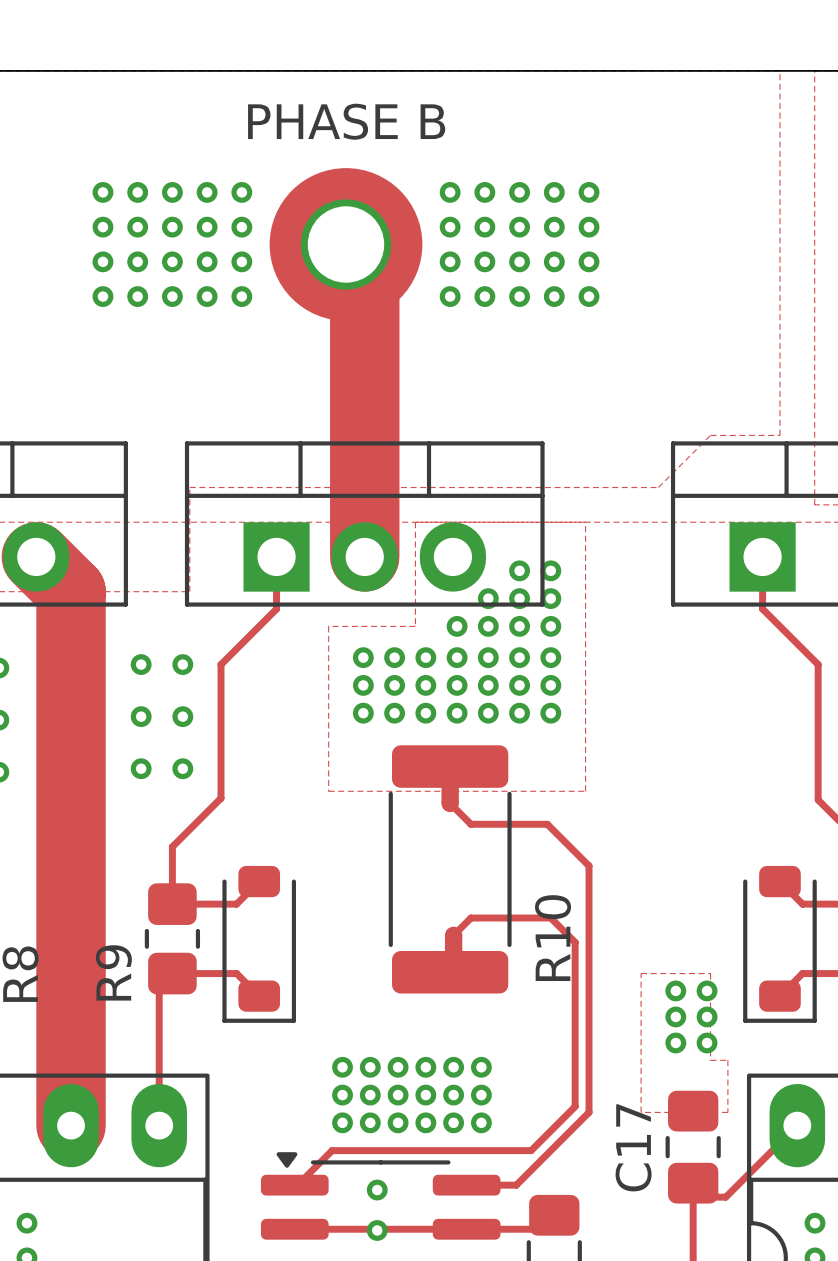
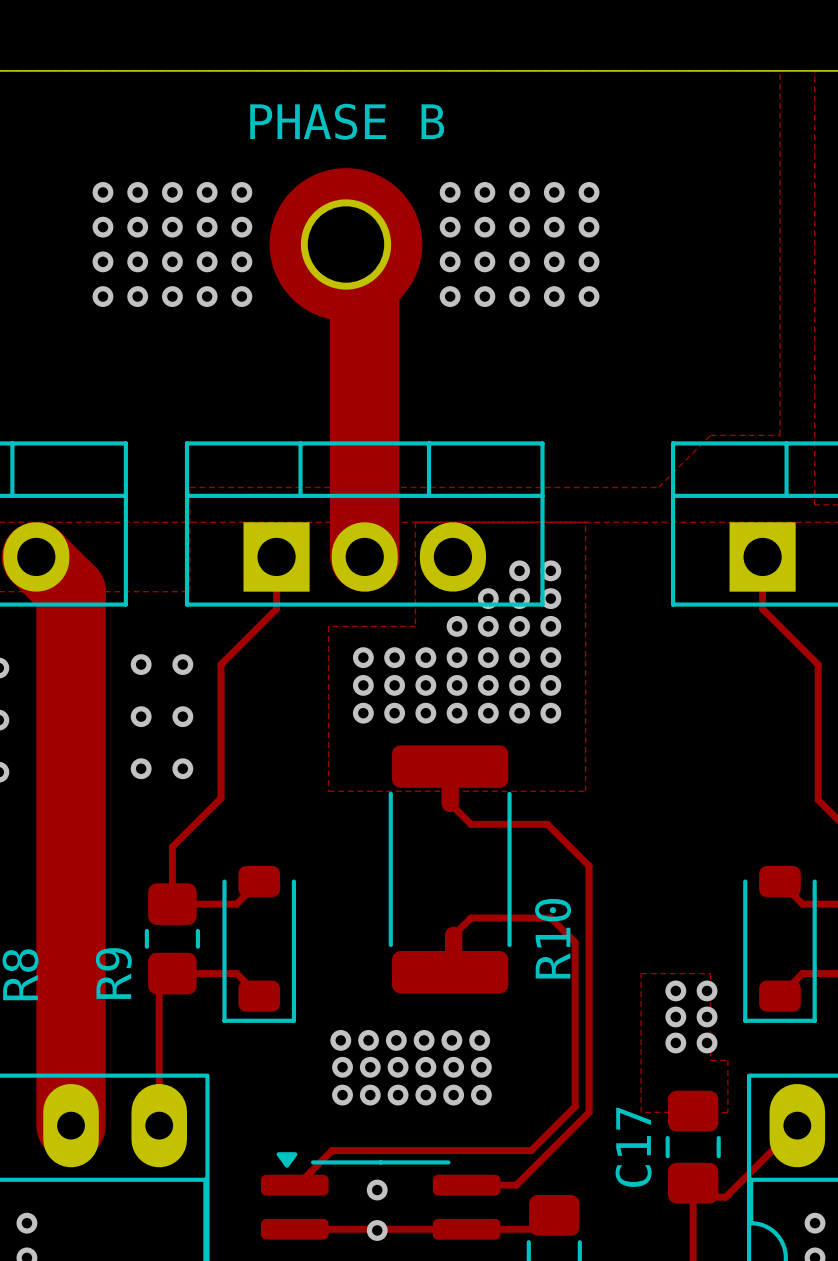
via: none -> (340, 1040)
via: none -> (368, 1040)
via: none -> (396, 1040)
via: none -> (424, 1040)
via: none -> (451, 1040)
via: none -> (479, 1040)
via: (342, 1122) -> none
via: (370, 1122) -> none
via: (398, 1122) -> none
via: (425, 1122) -> none
via: (453, 1122) -> none
via: (481, 1122) -> none

